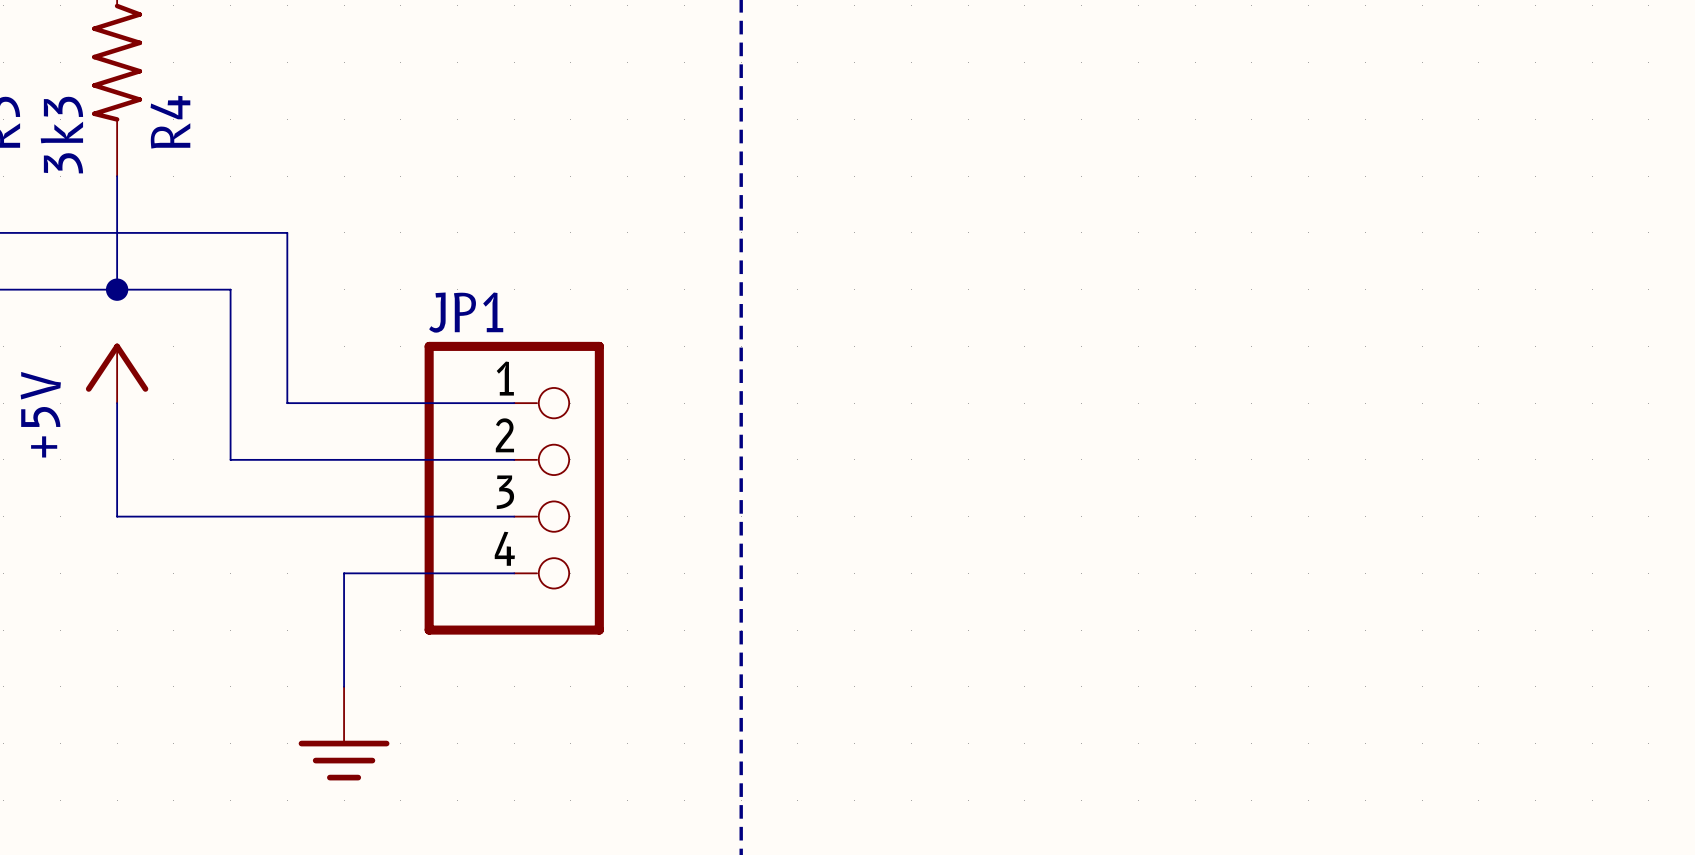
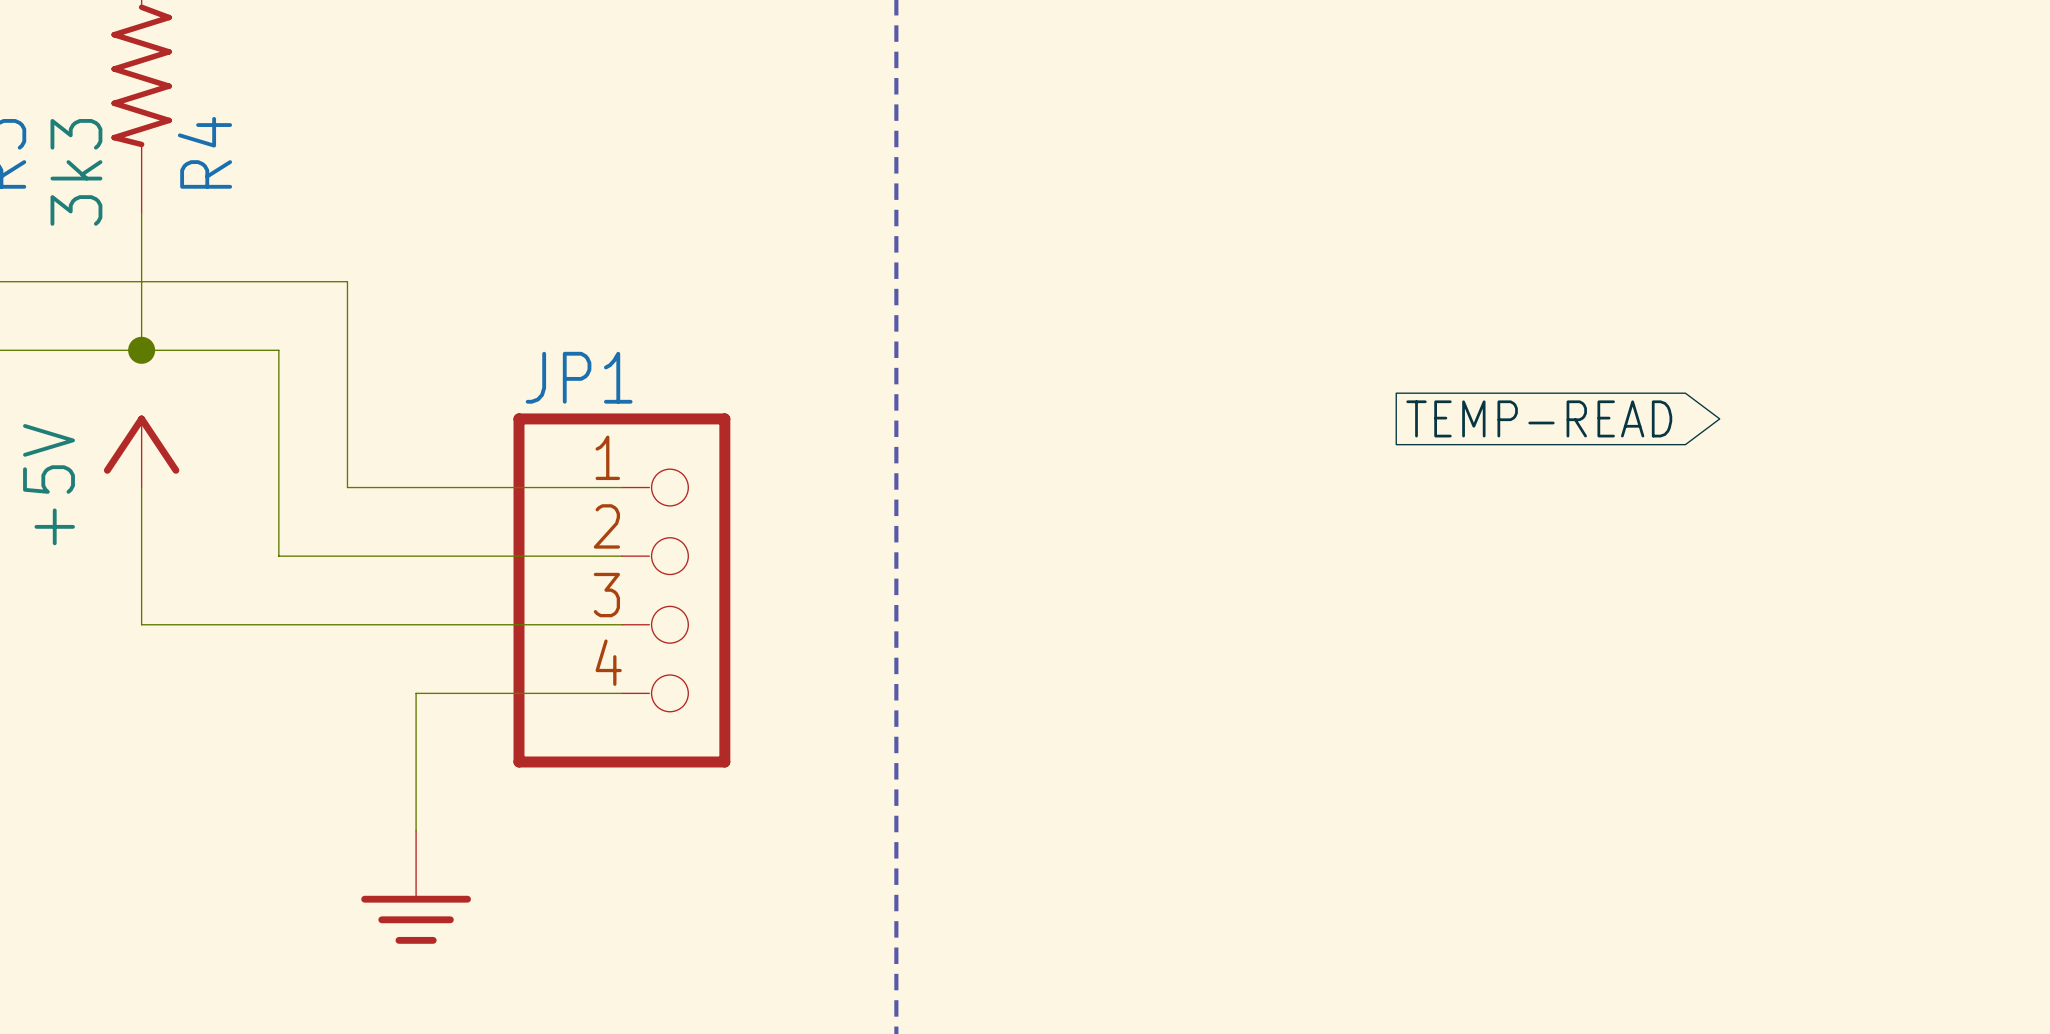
global label: none -> TEMP-READ (1539, 418)

